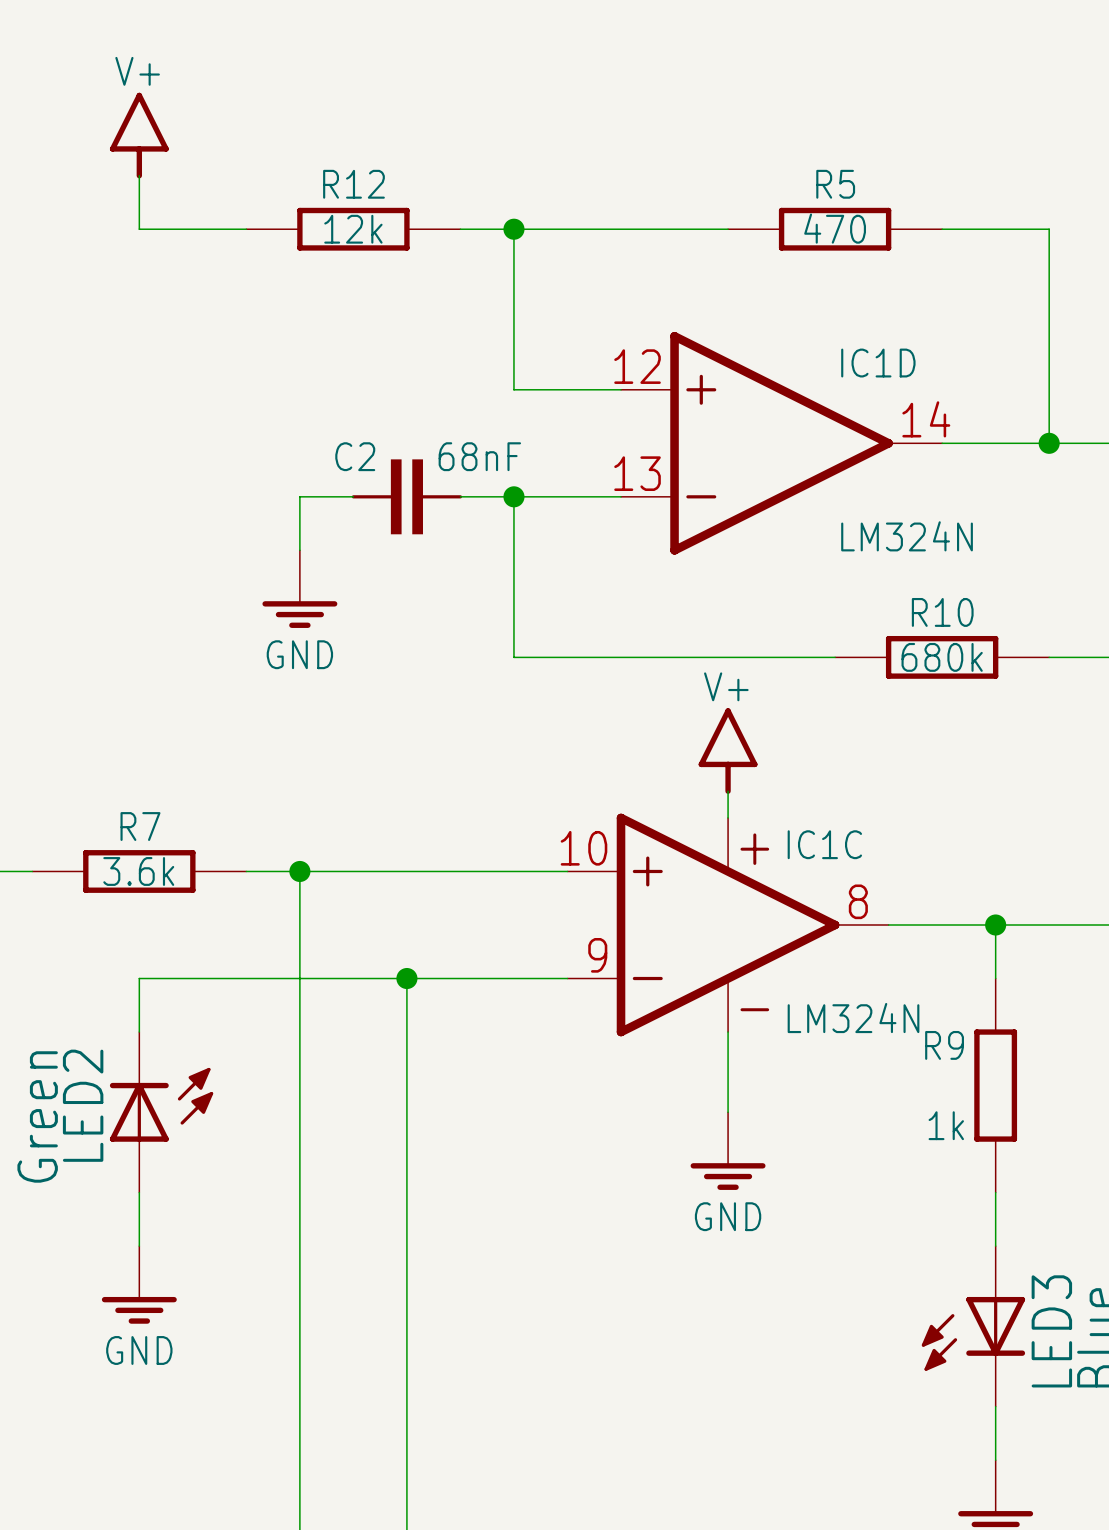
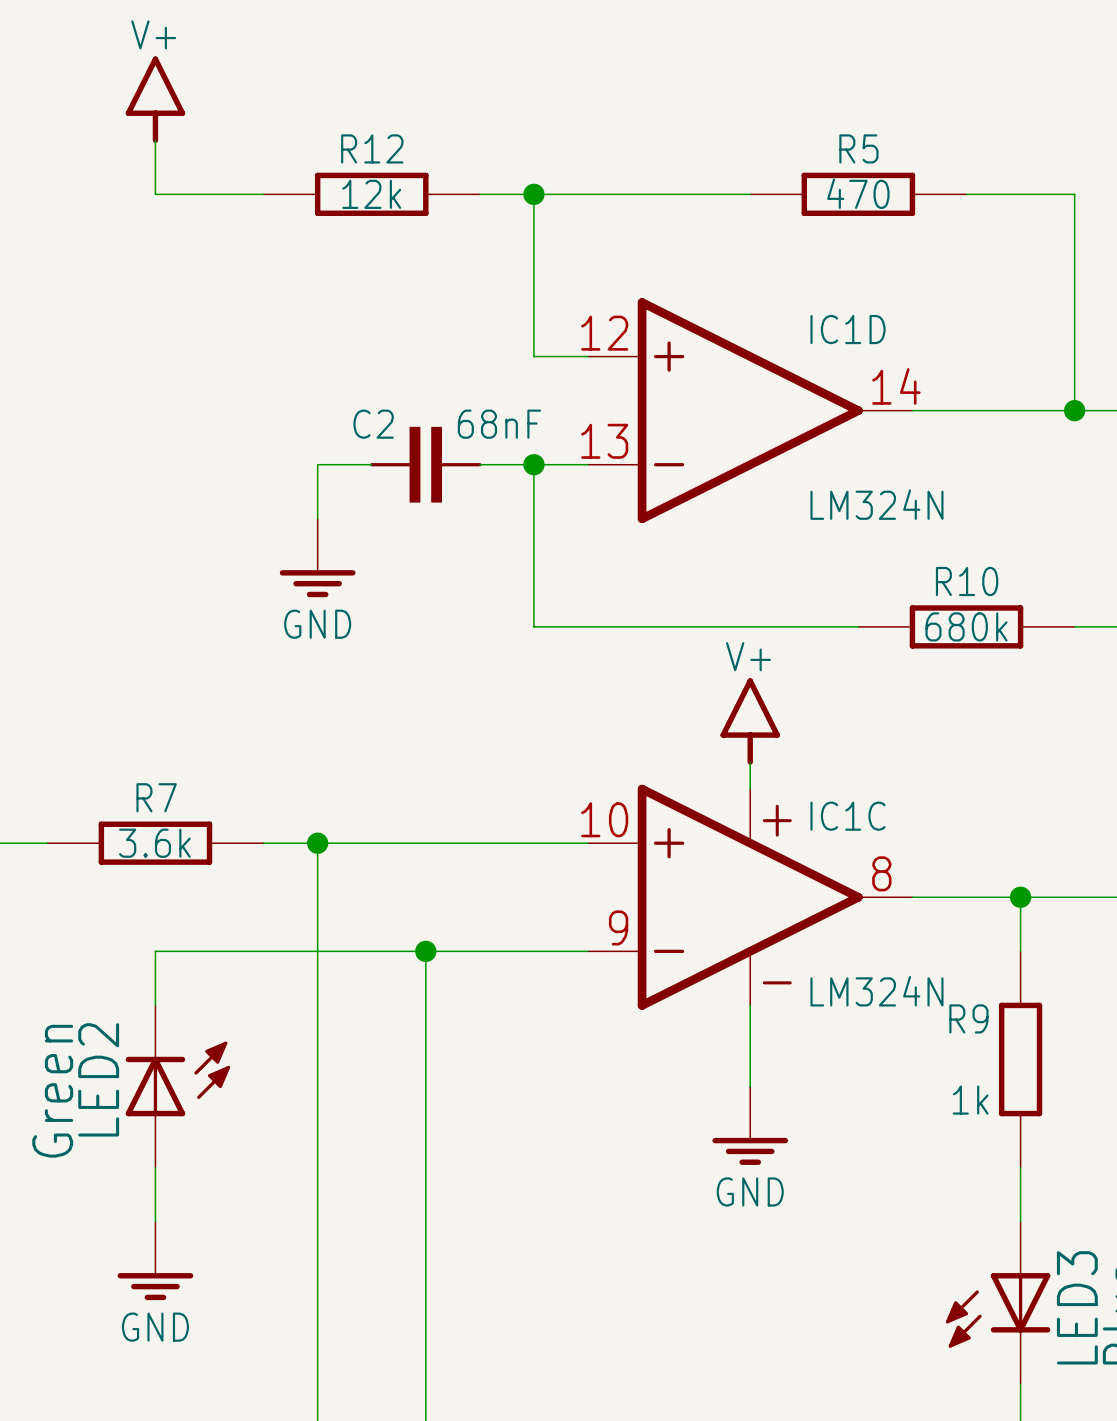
IC1D position: (781, 443) -> (750, 410)

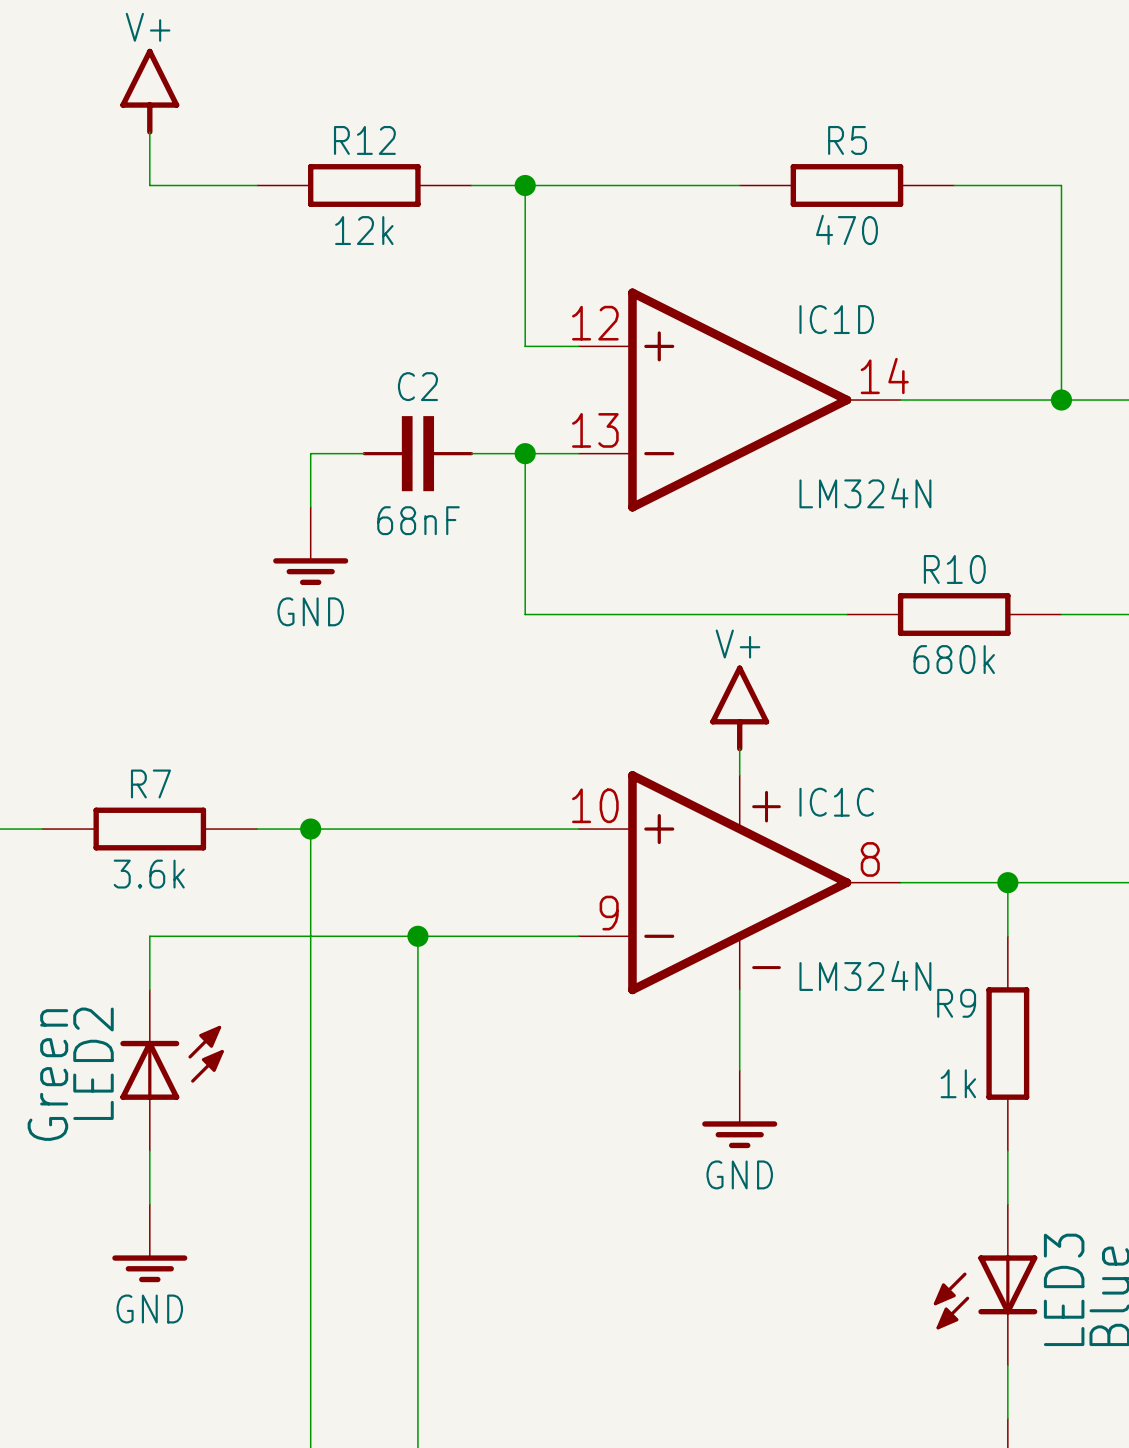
R5 value position: 470 (858, 193) -> 470 (846, 229)
R12 value position: 12k (371, 194) -> 12k (364, 230)
C2 name position: C2 (373, 424) -> C2 (417, 386)
C2 value position: 68nF (499, 424) -> 68nF (418, 520)
R10 value position: 680k (966, 626) -> 680k (954, 659)
R7 value position: 3.6k (154, 843) -> 3.6k (149, 874)

